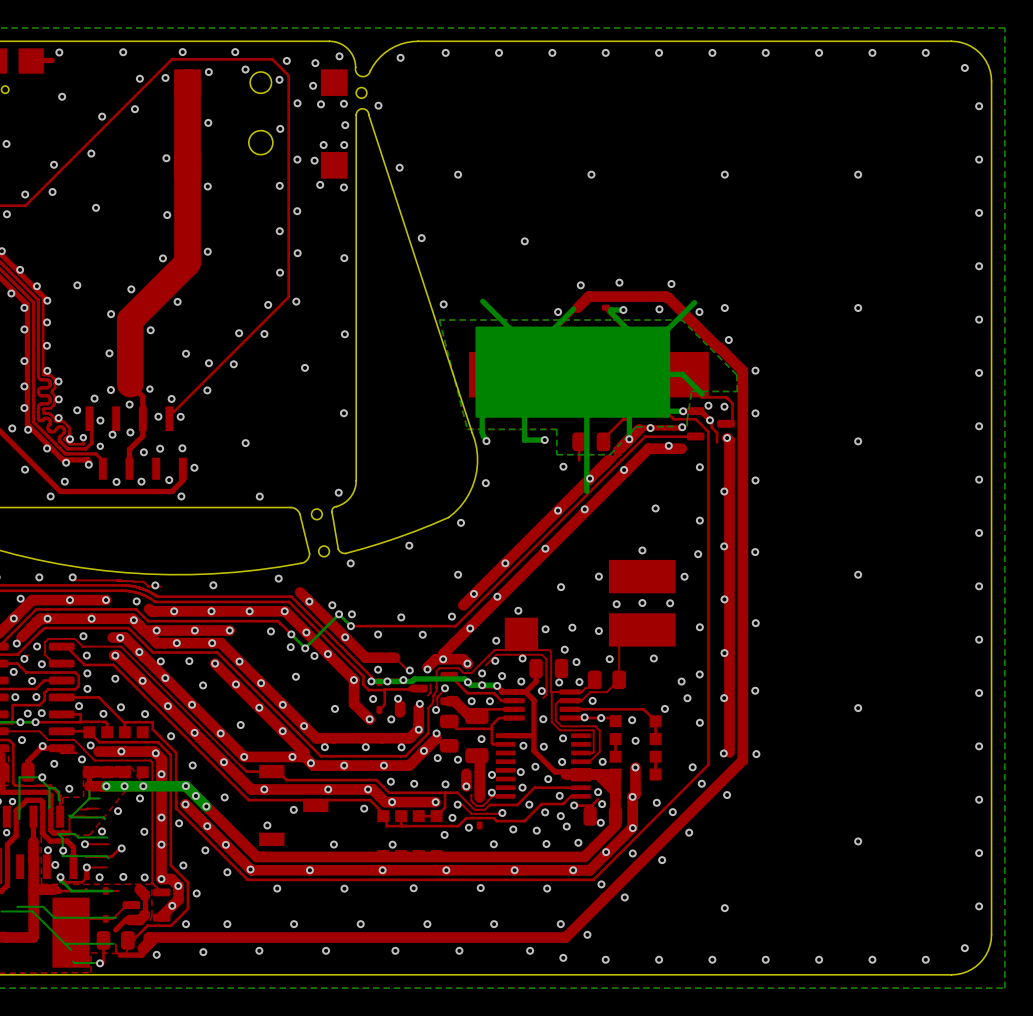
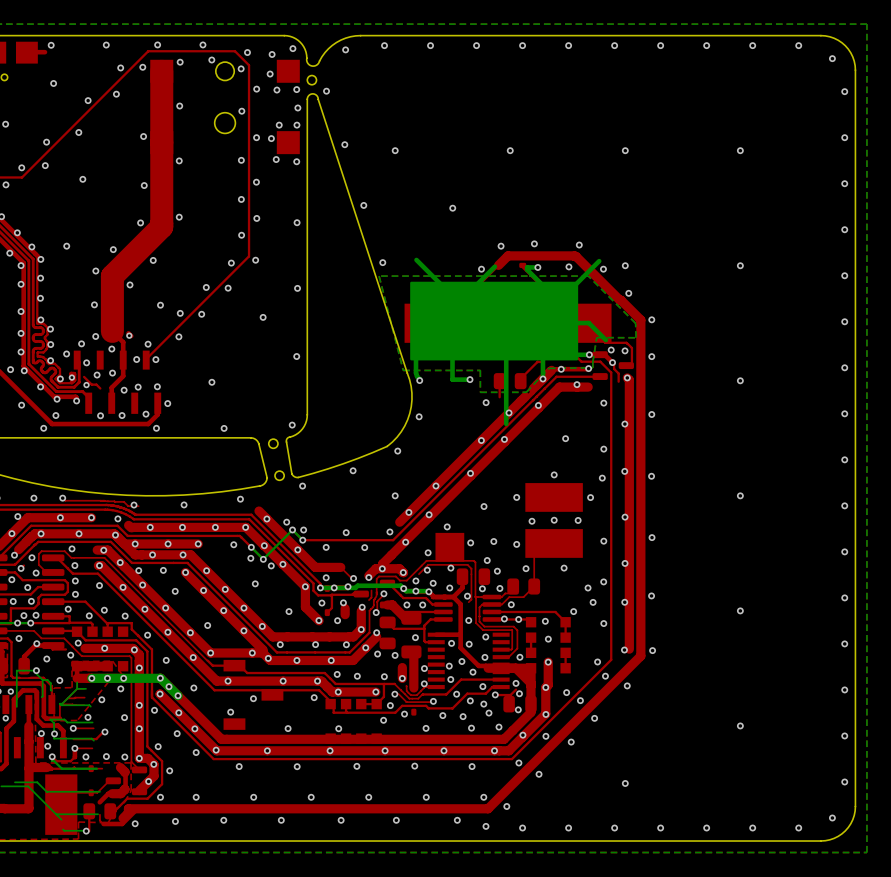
top track: none -> (128, 333) (131, 336)
top track: none -> (71, 373) (74, 374) (72, 382)
top track: none -> (84, 376) (91, 384) (96, 384) (100, 388)
part rotation: 0° (136, 443) -> 180° (117, 382)

